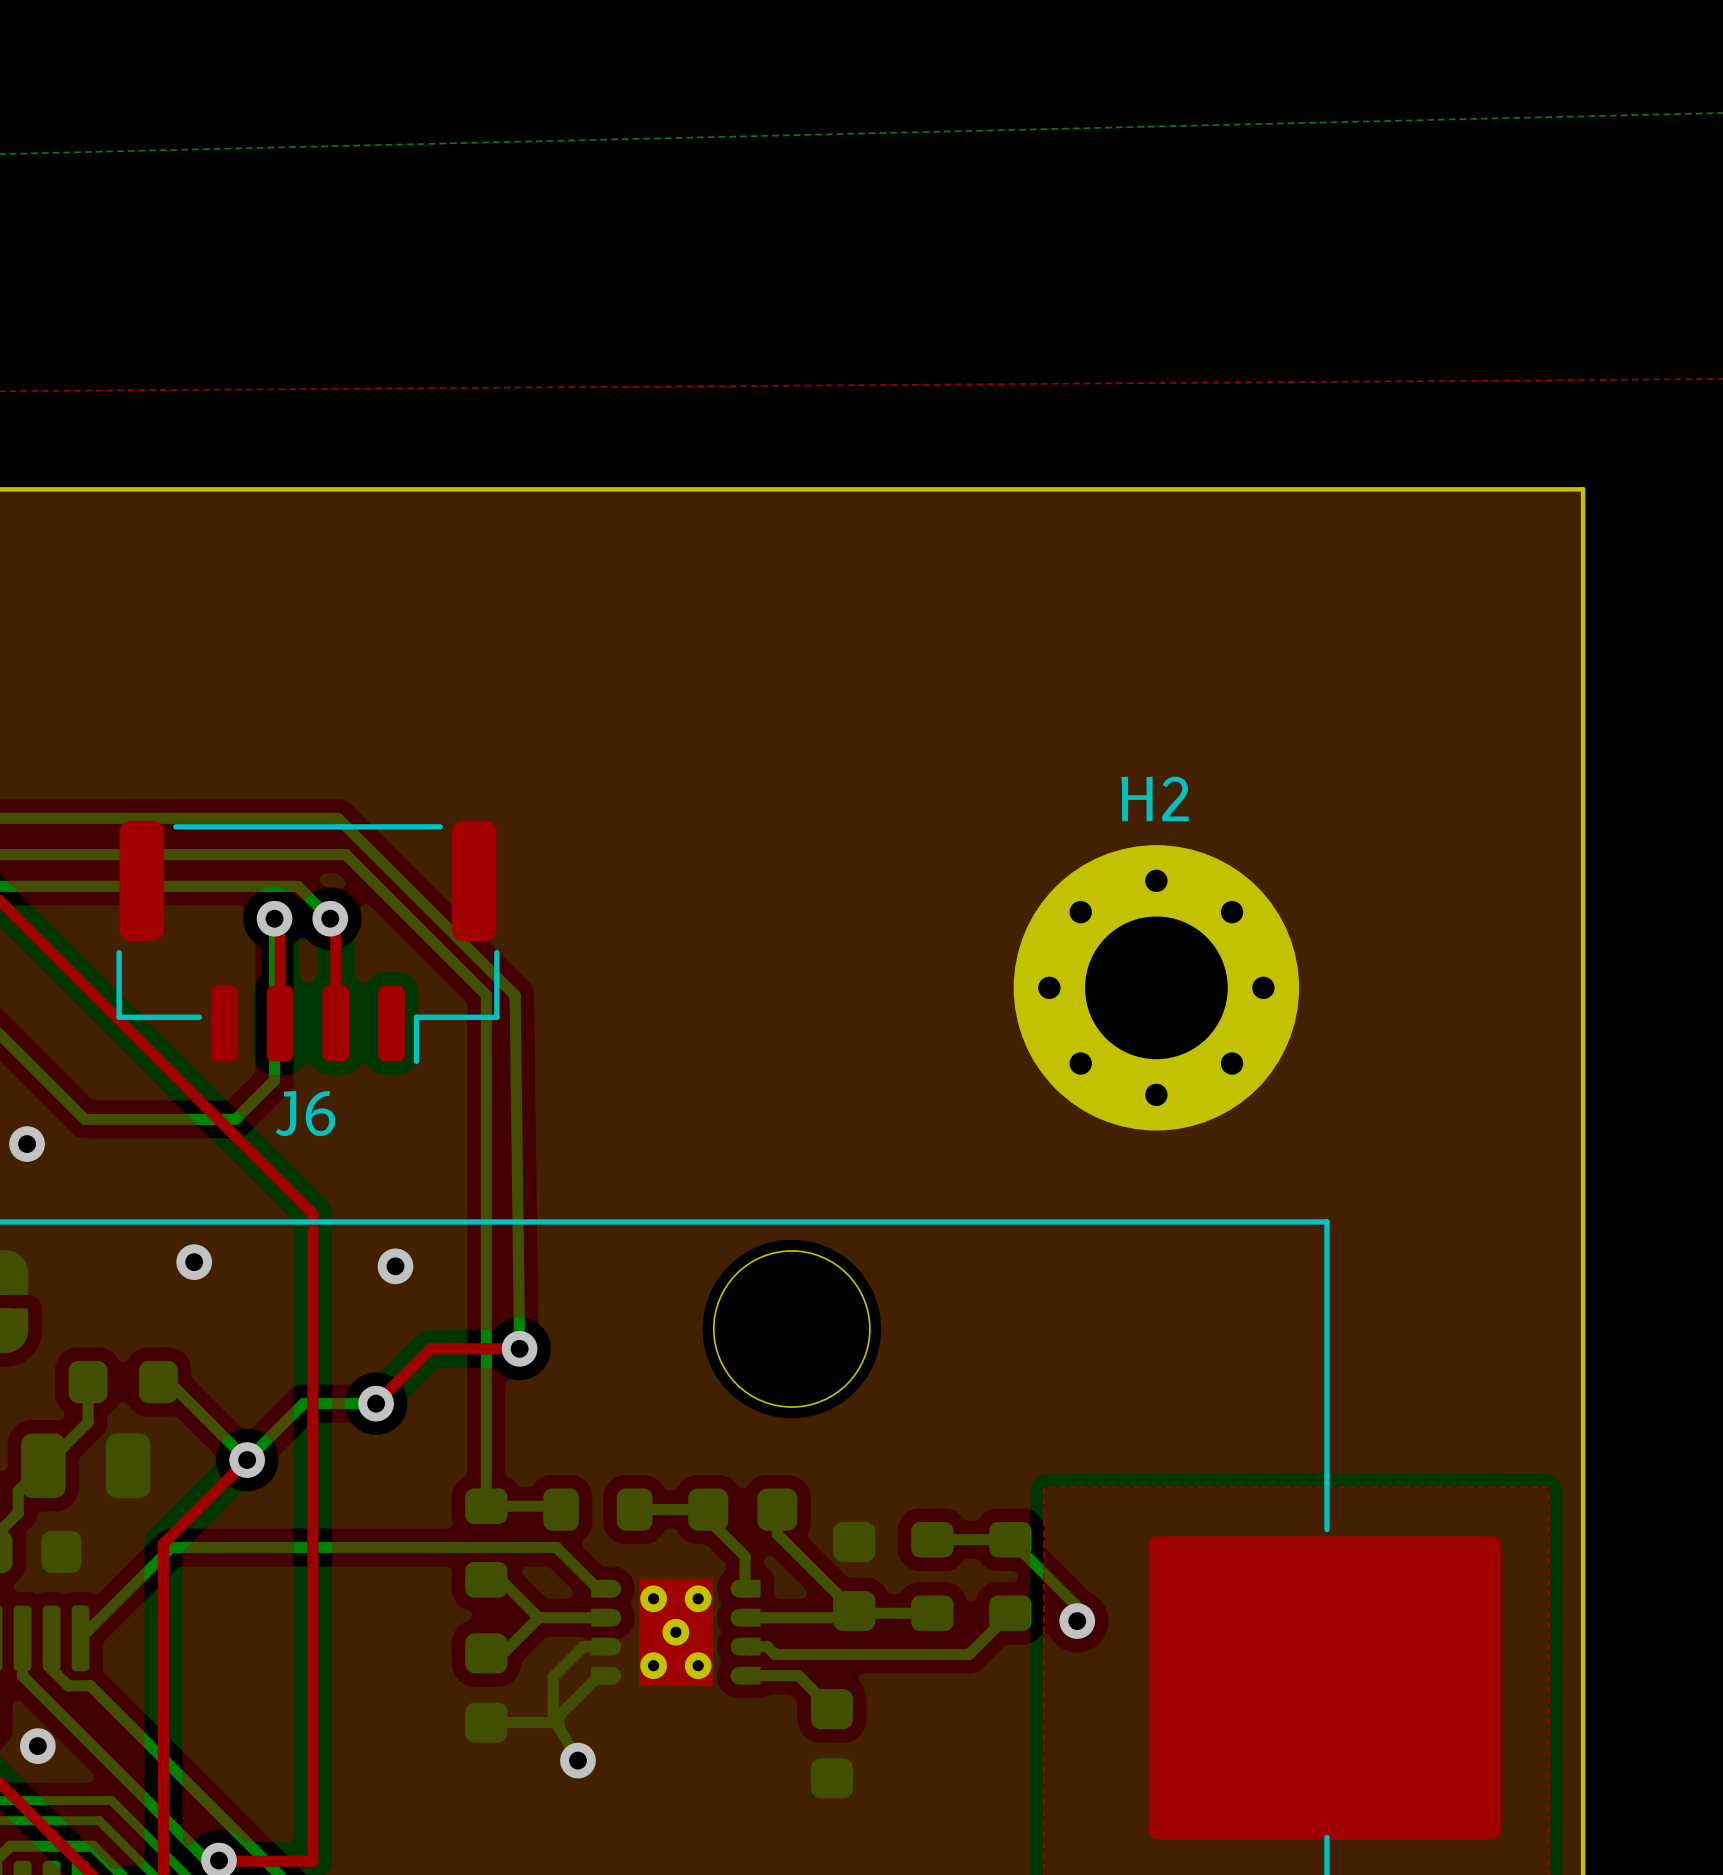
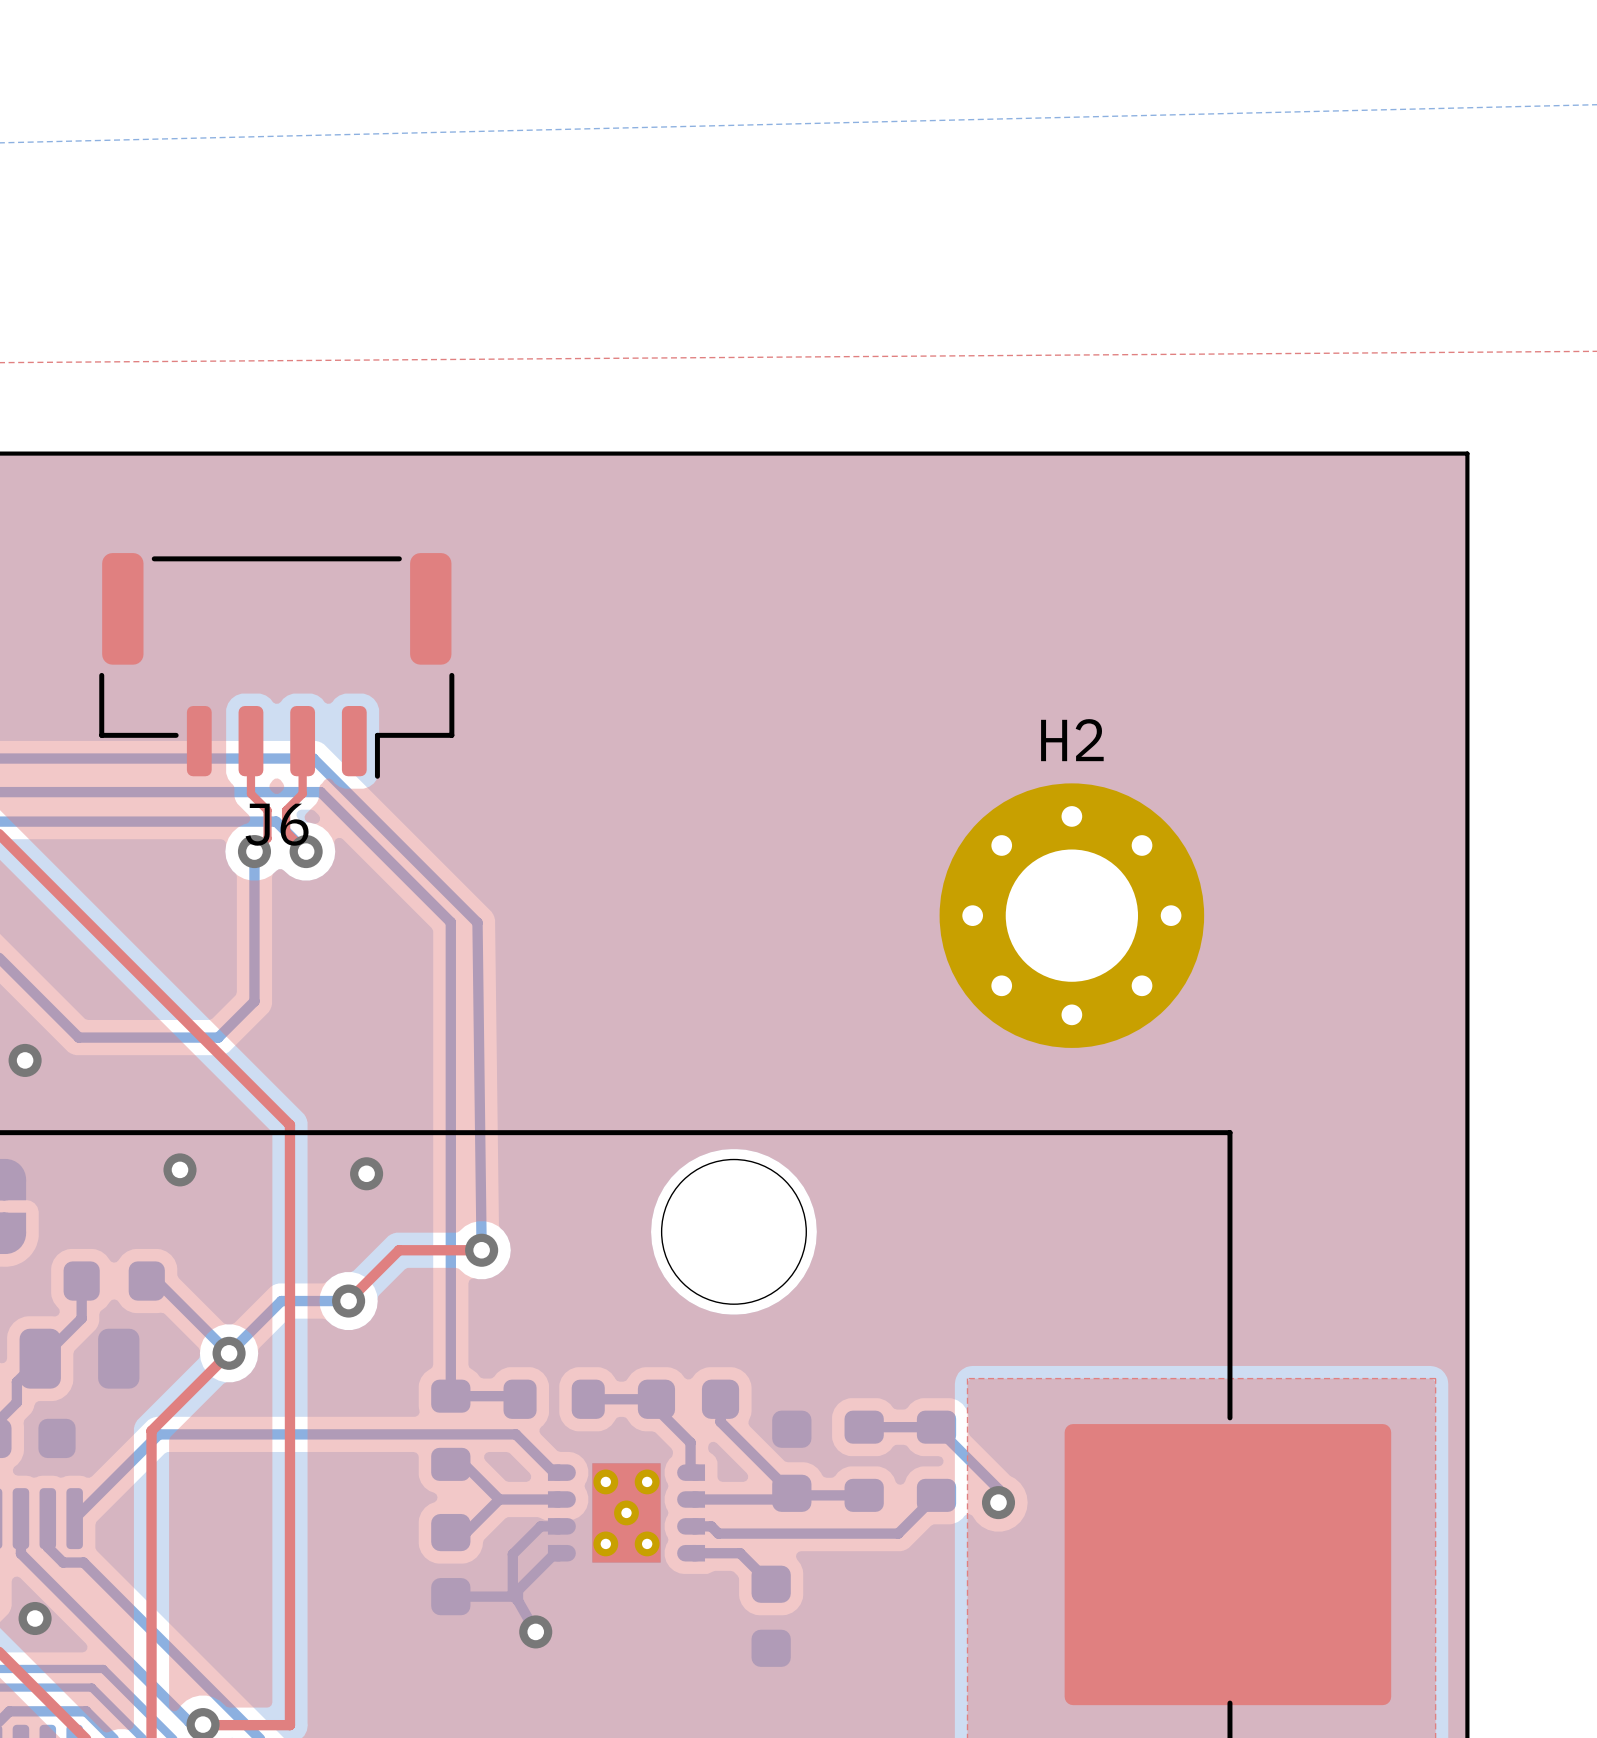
top track: none -> (250, 741) (250, 793) (267, 810) (266, 839)
top track: none -> (302, 741) (302, 793) (286, 810) (286, 831) (306, 851) (302, 848)
top track: (280, 924) (280, 1023) -> none
top track: (335, 924) (335, 1023) -> none
J6 position: (307, 942) -> (276, 665)

